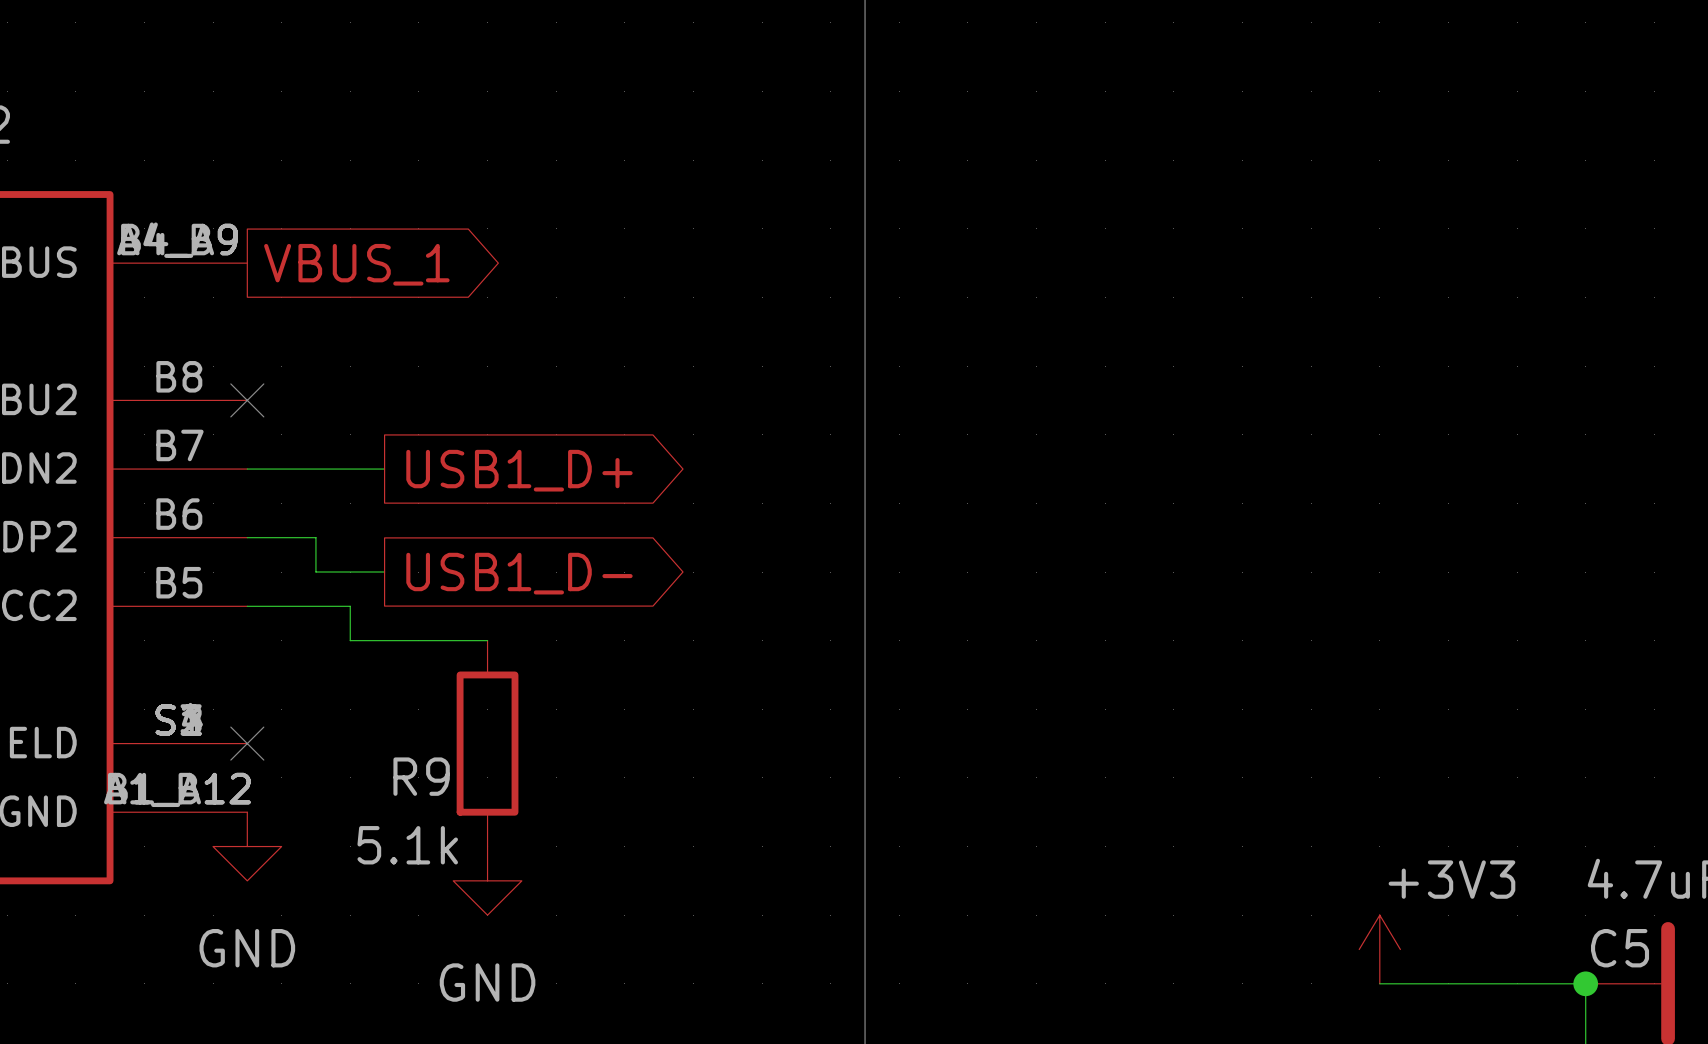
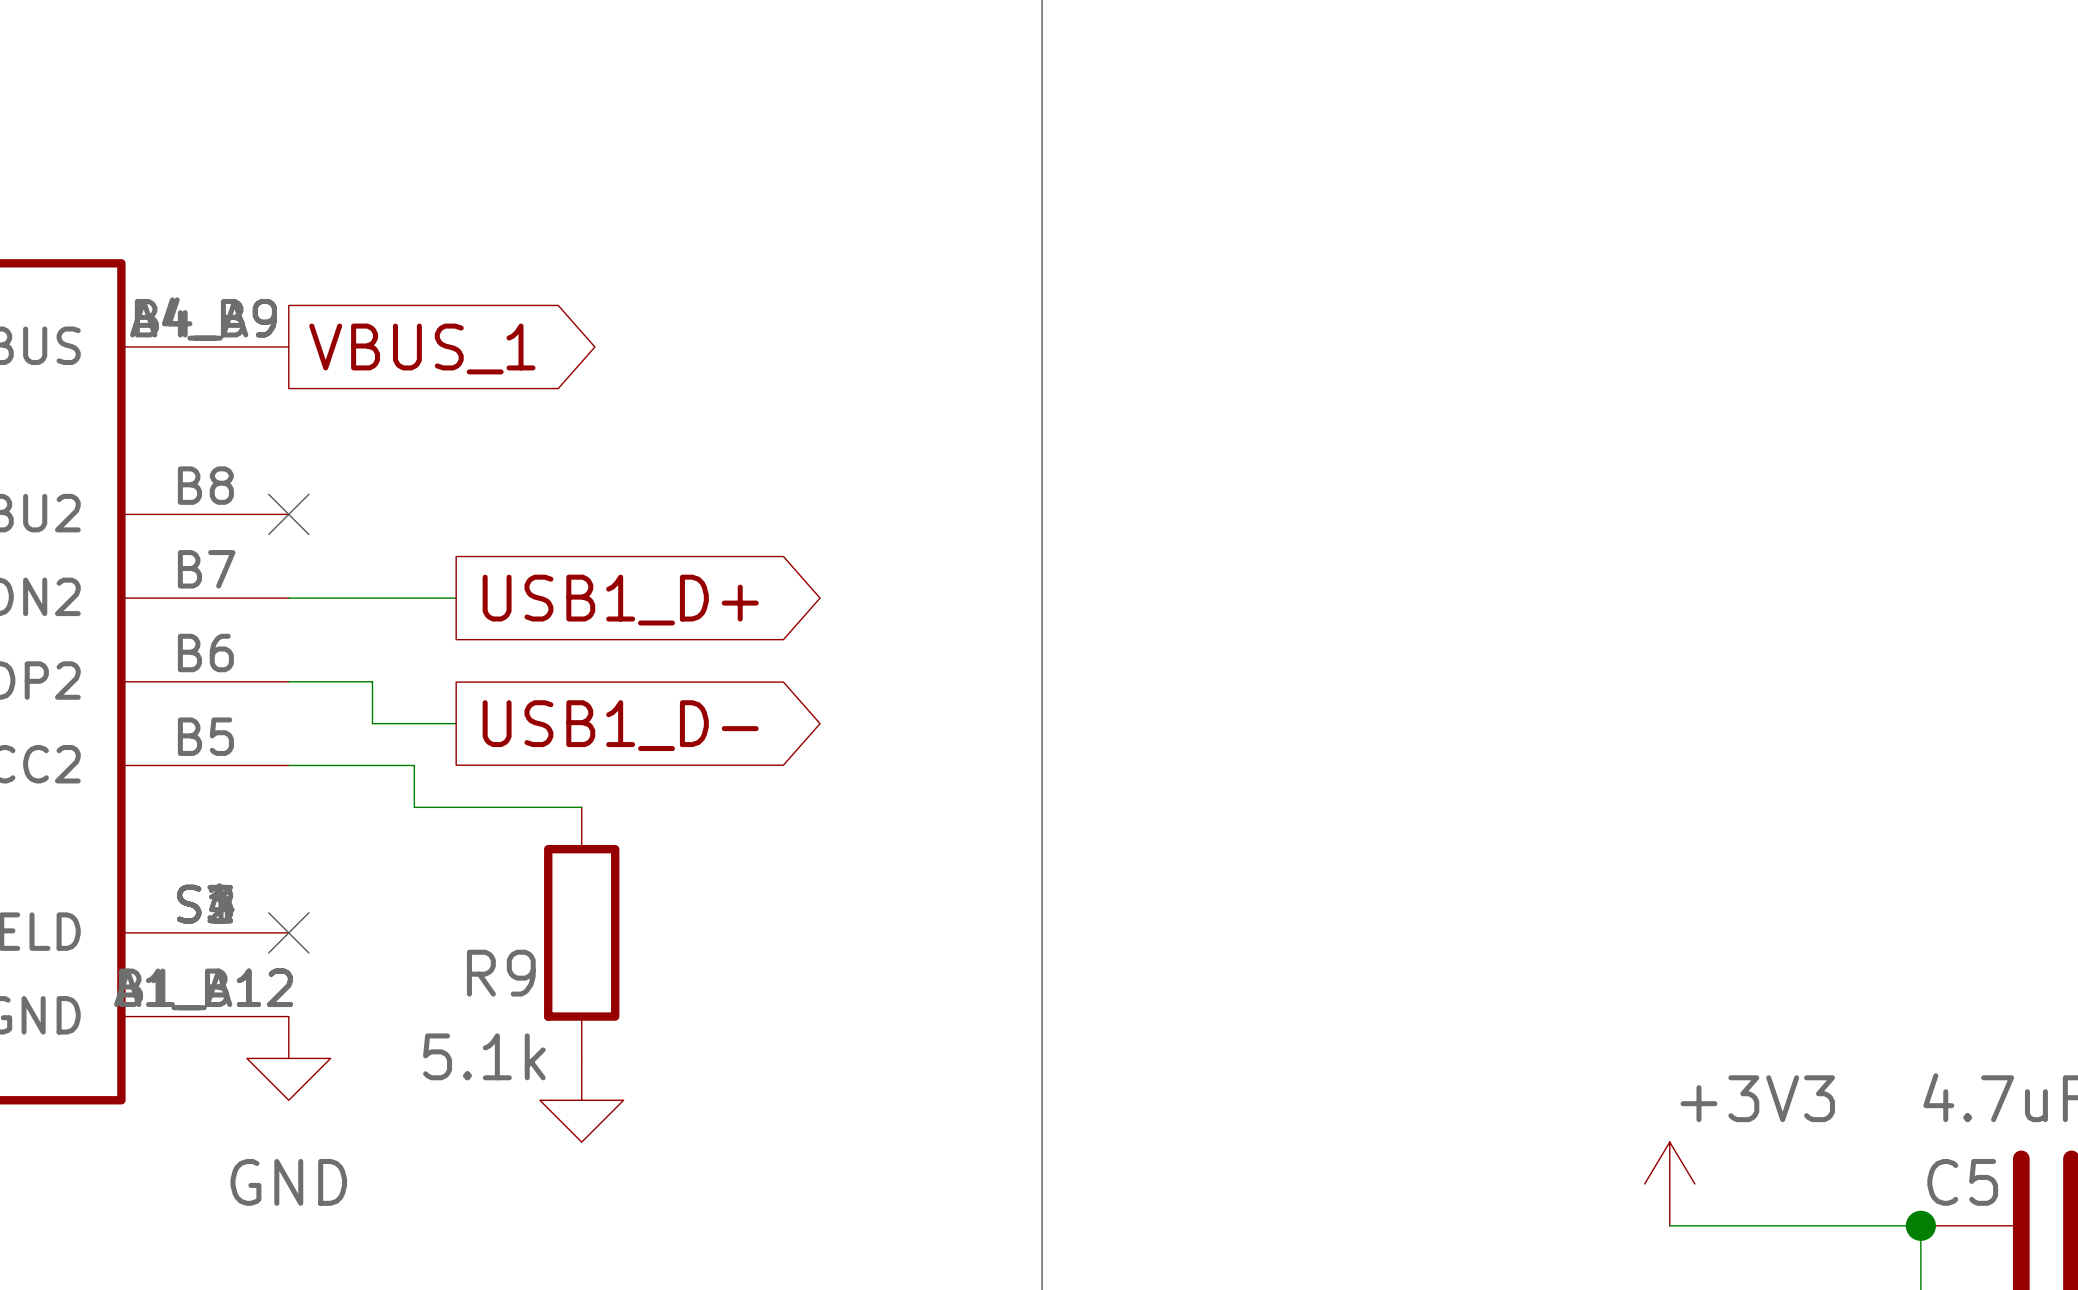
power symbol text: GND (487, 982) -> none

